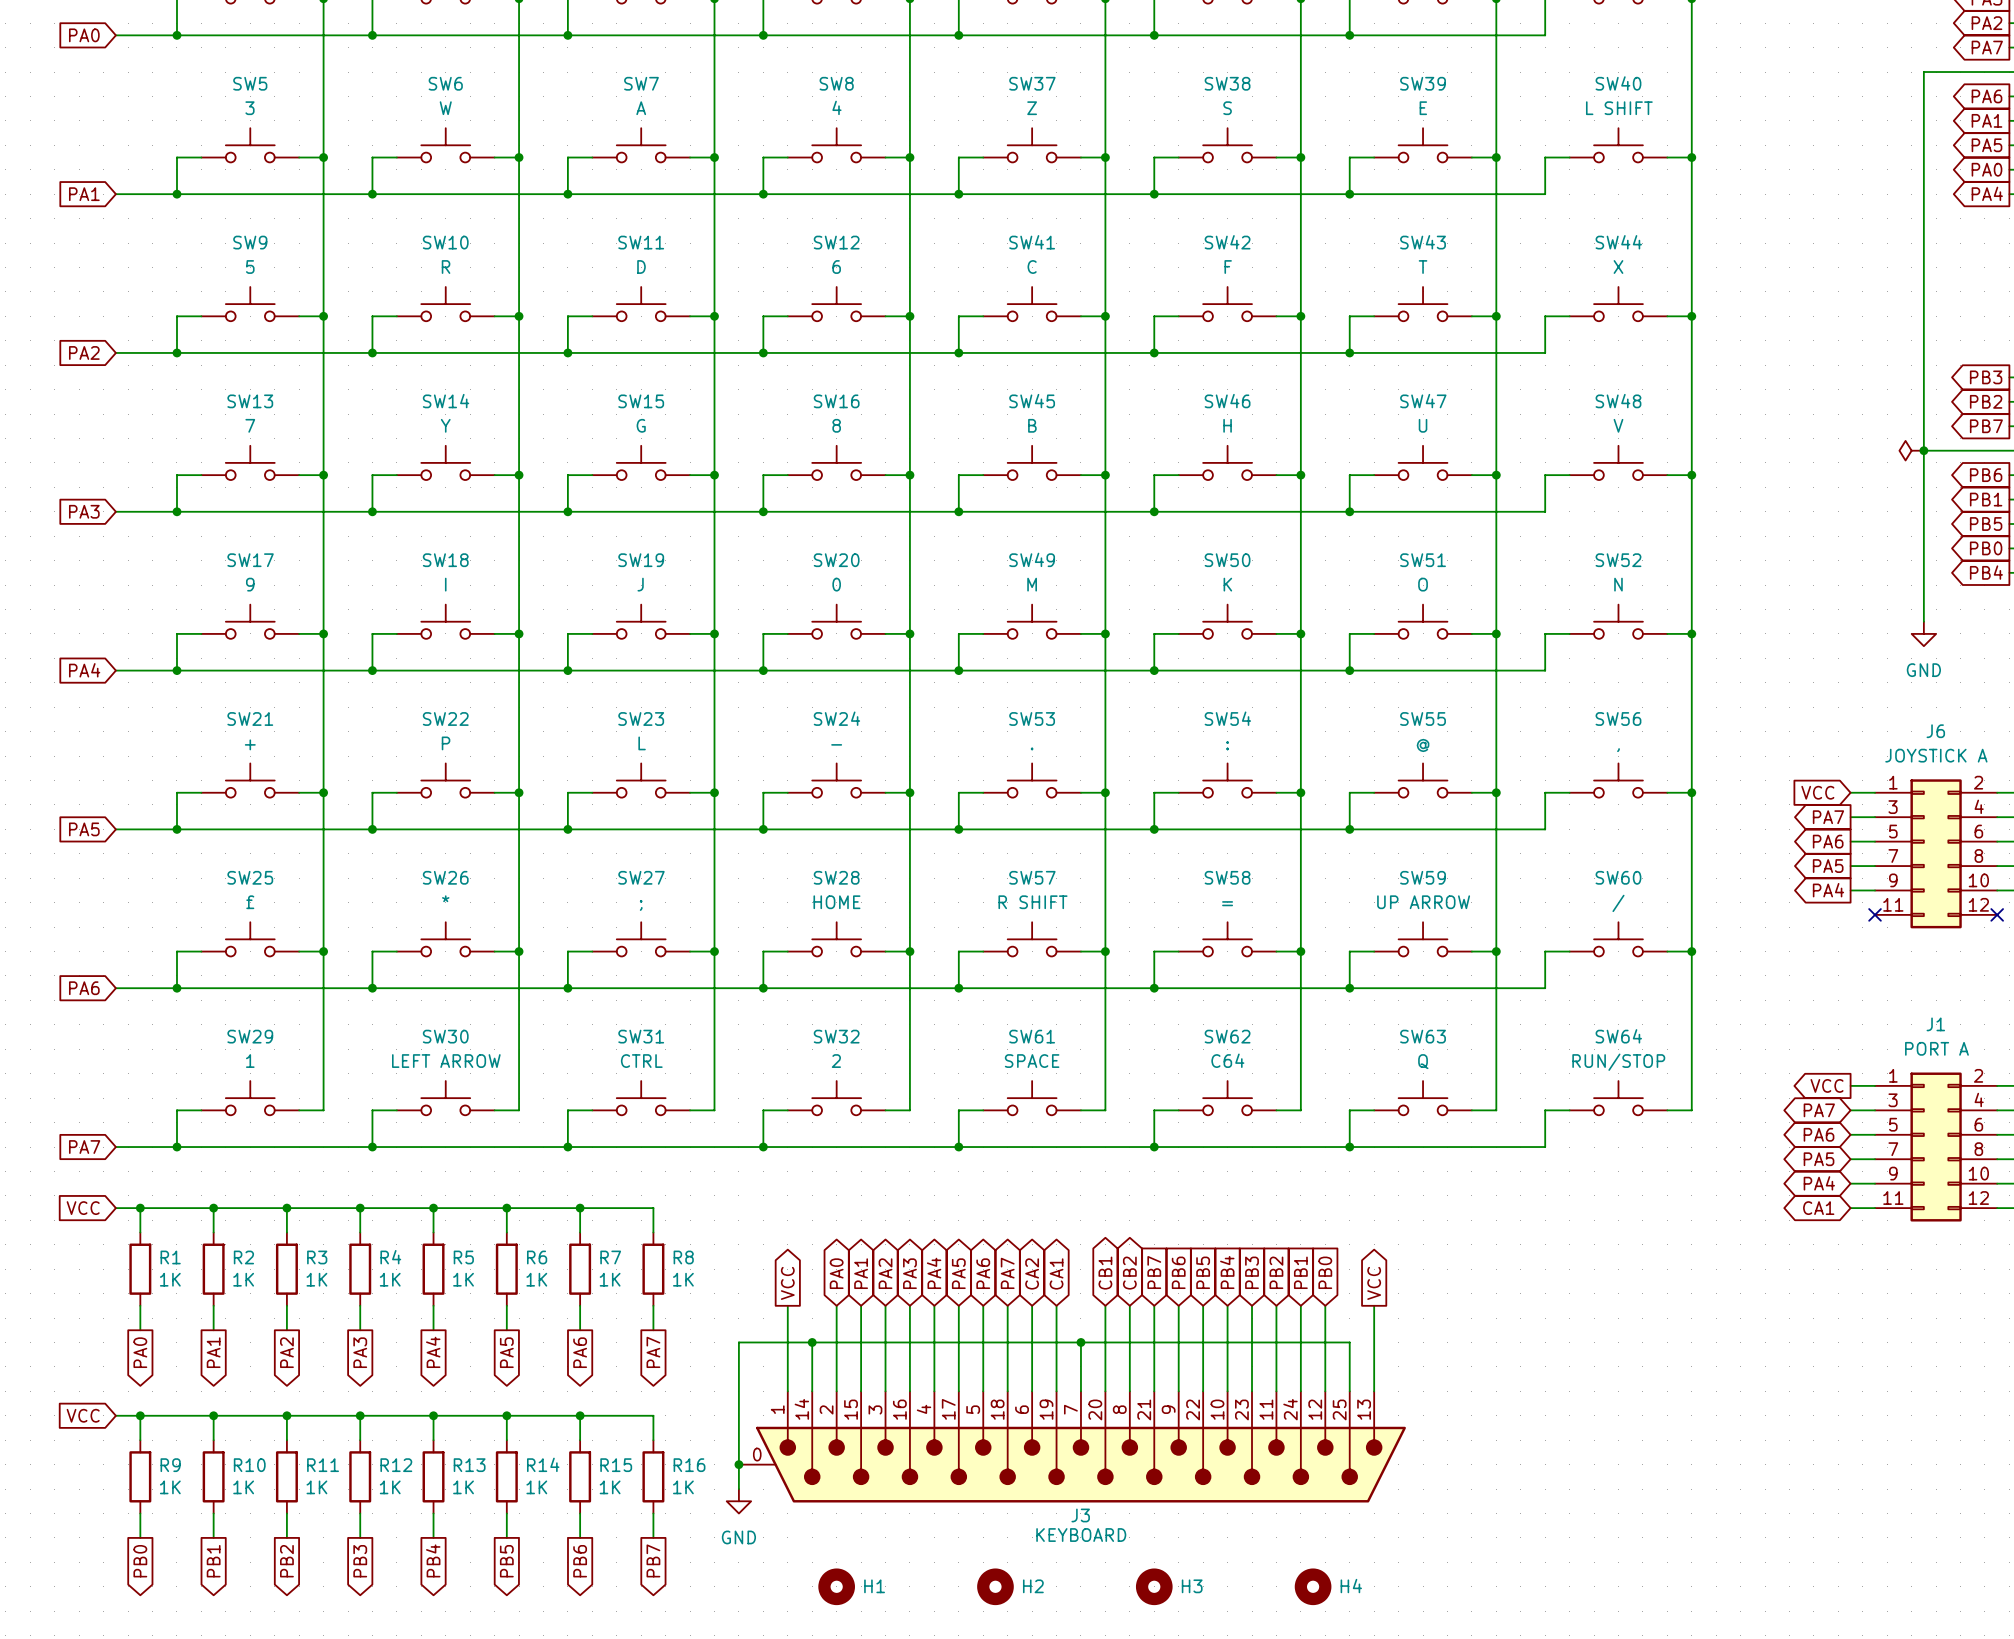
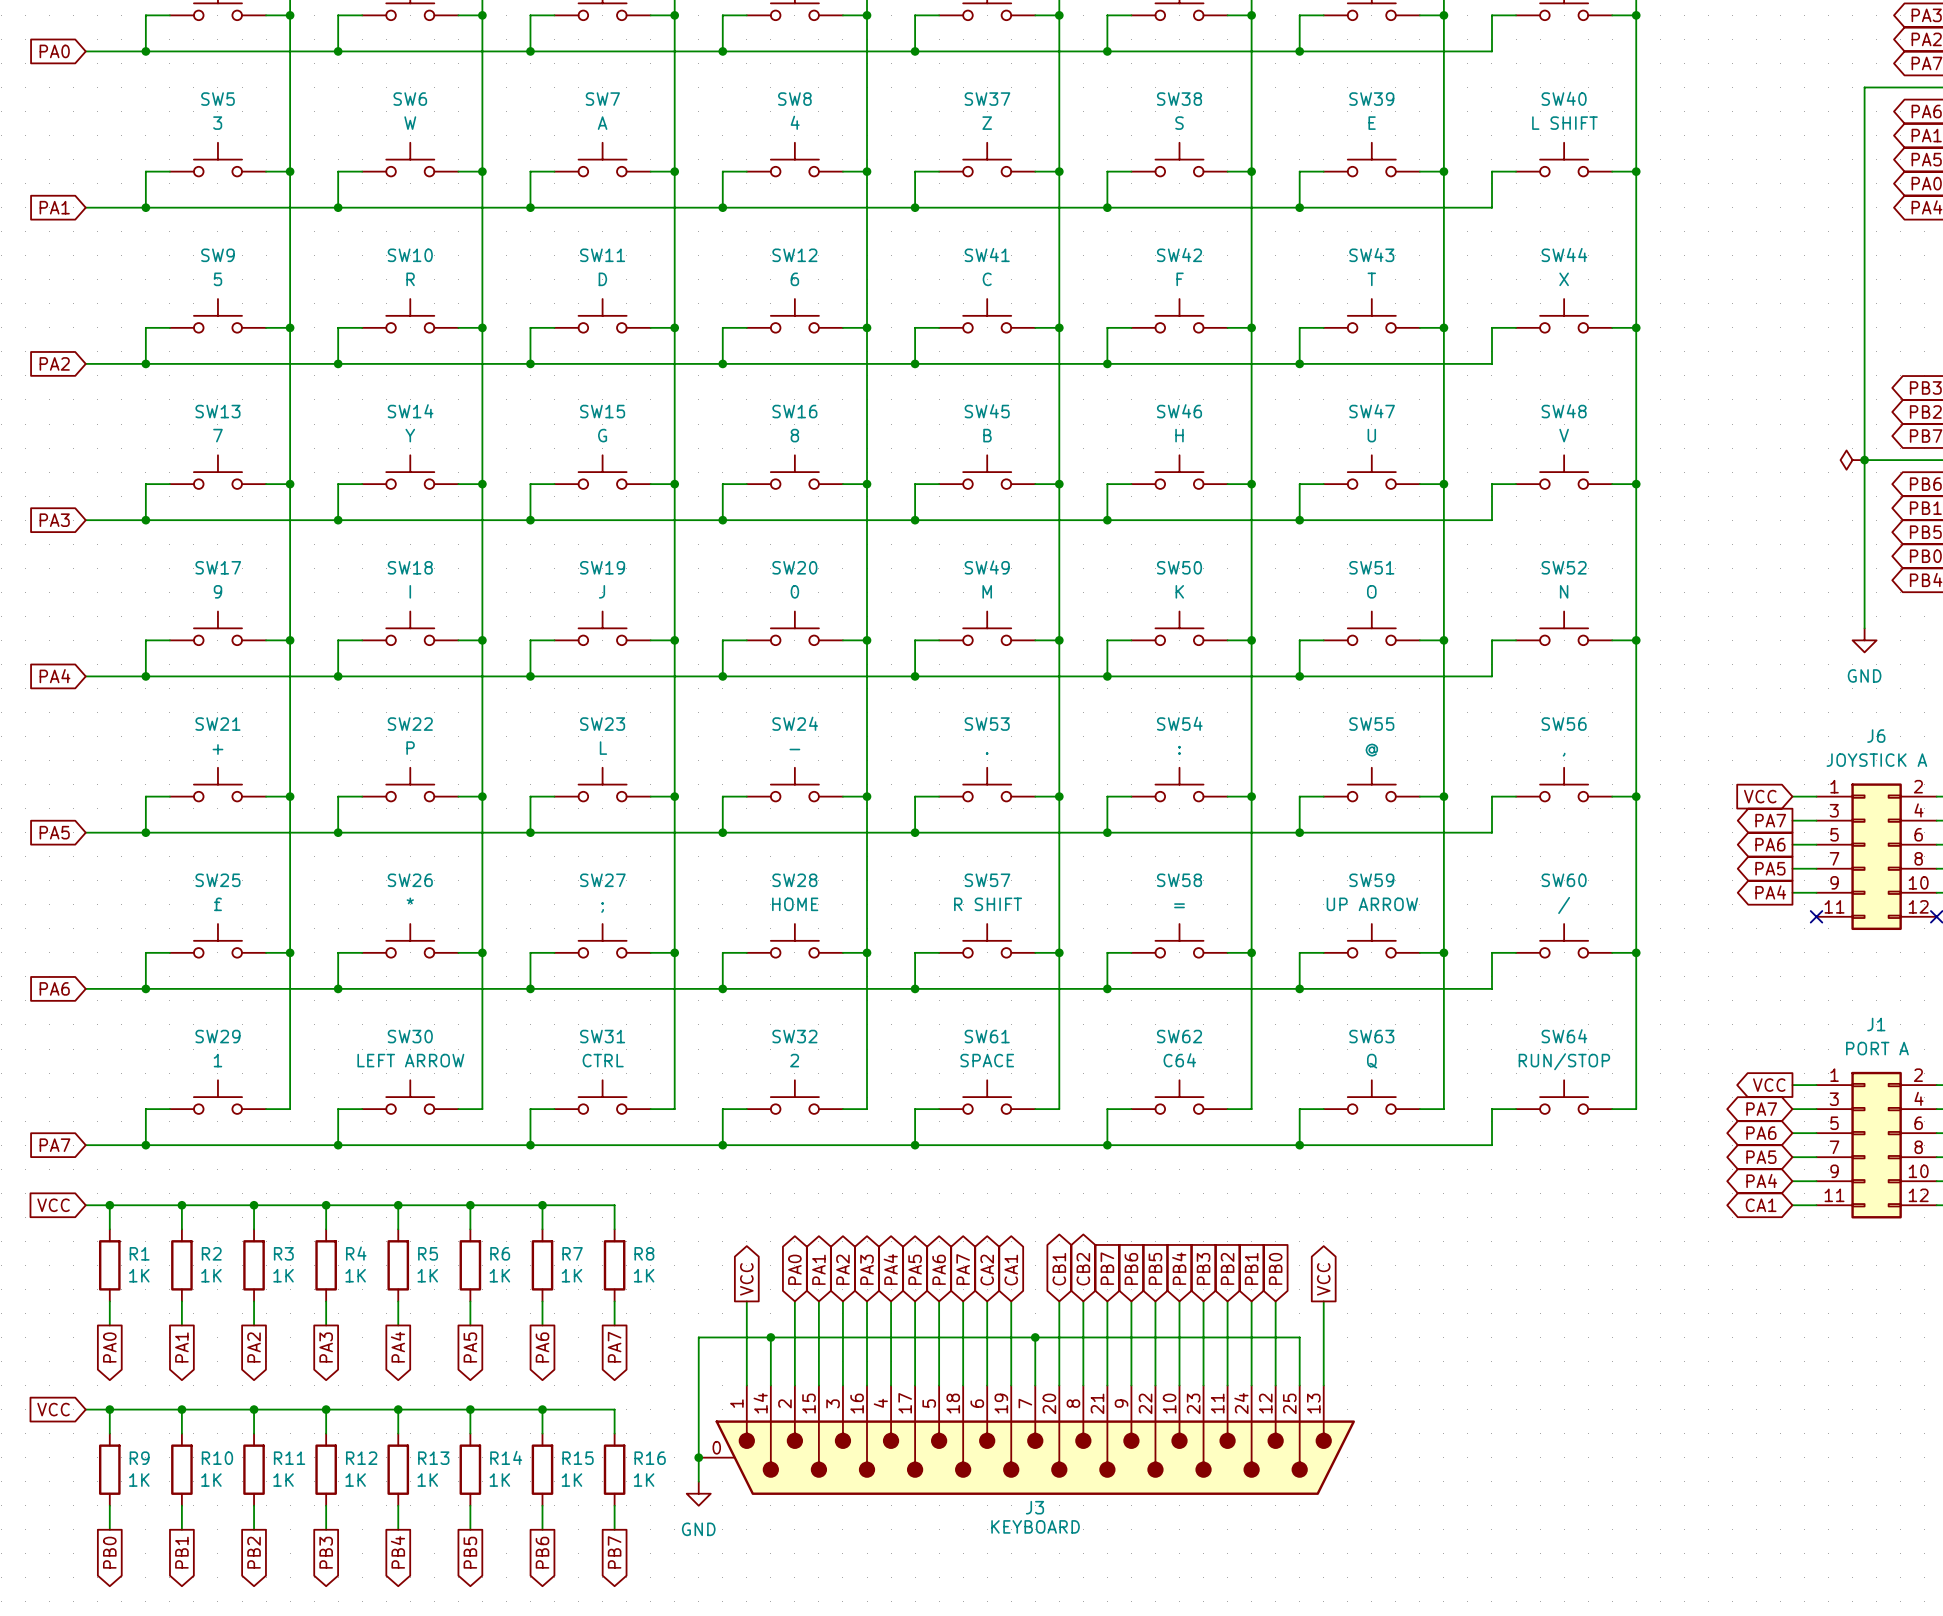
H1: (836, 1586) -> none
H2: (995, 1586) -> none
H3: (1154, 1586) -> none
H4: (1313, 1586) -> none

